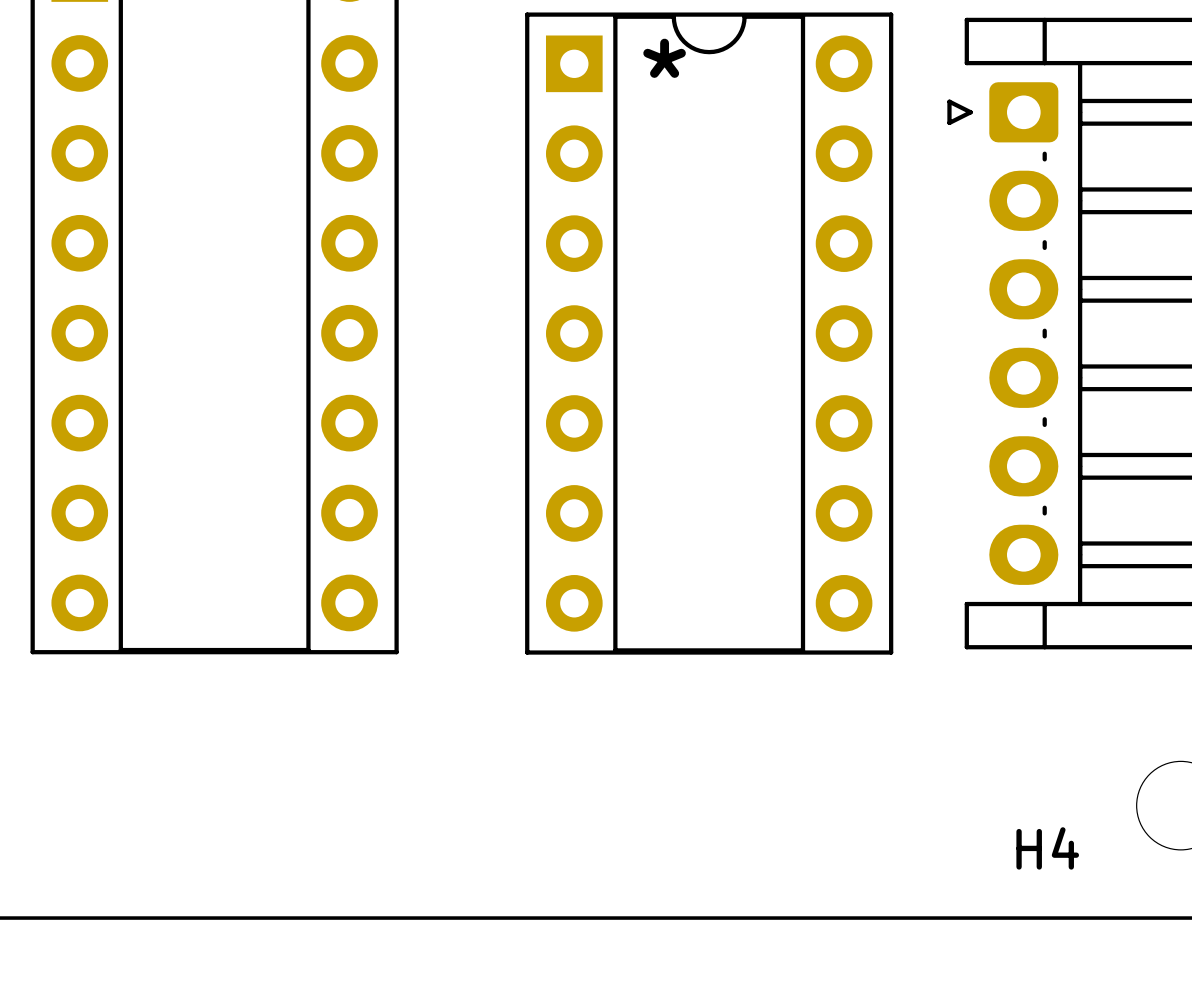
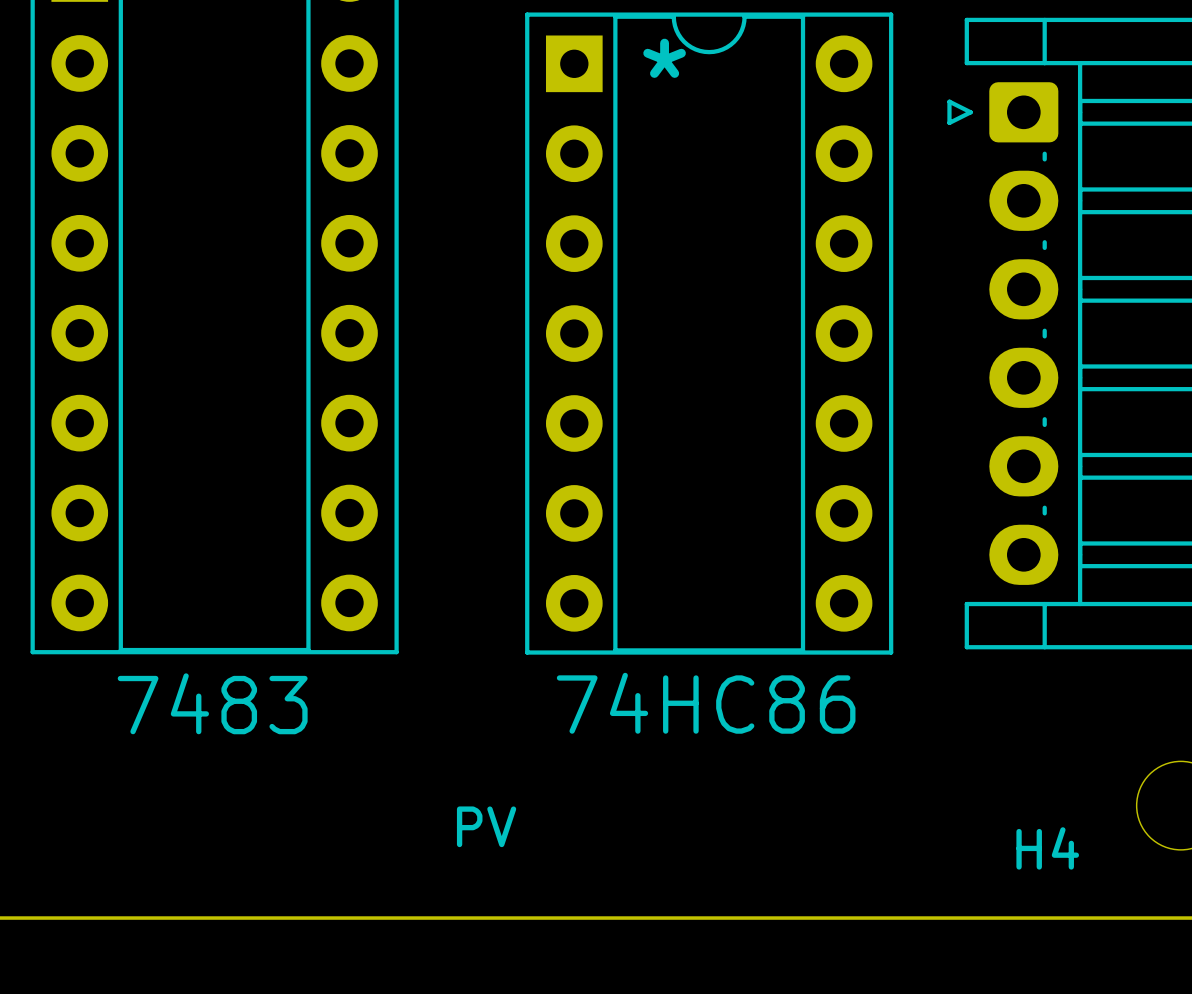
part value: none -> 7483 (212, 703)
part value: none -> 74HC86 (706, 703)
text: none -> PV (486, 826)

